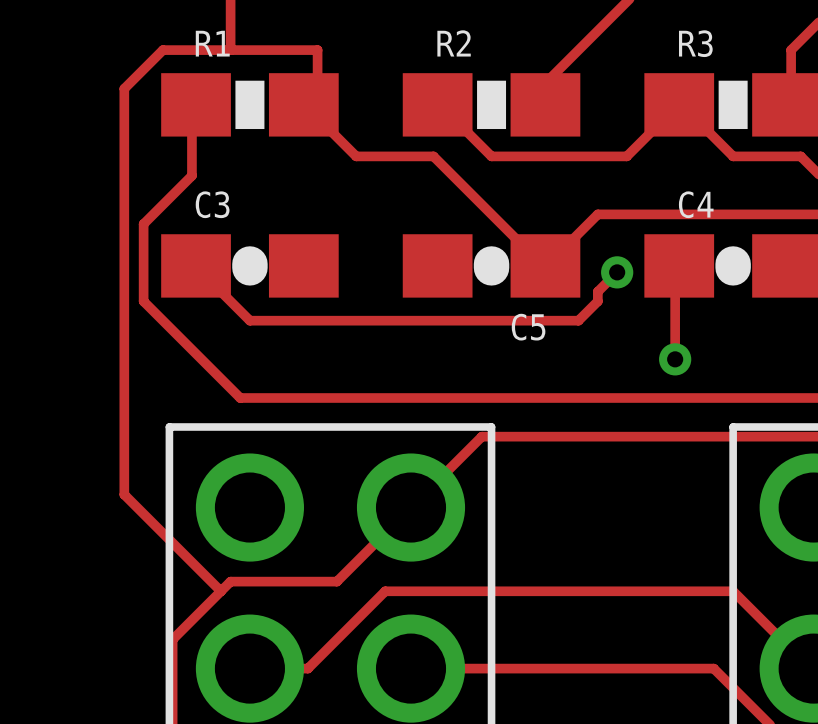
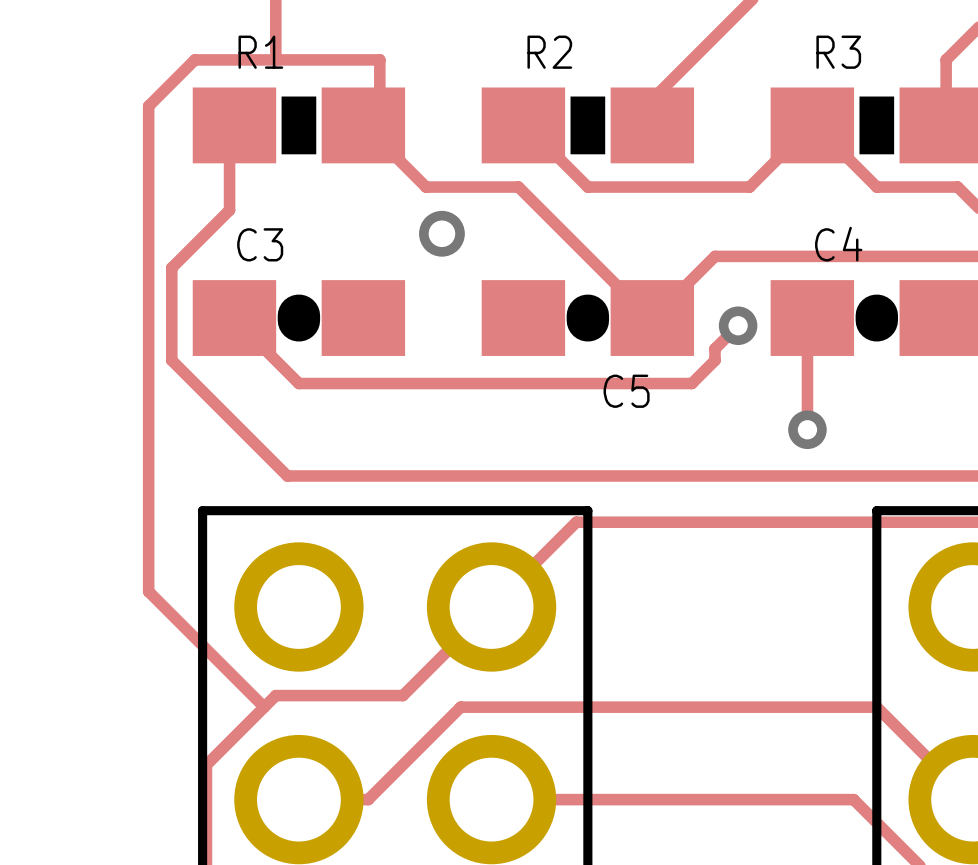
via: none -> (441, 233)

